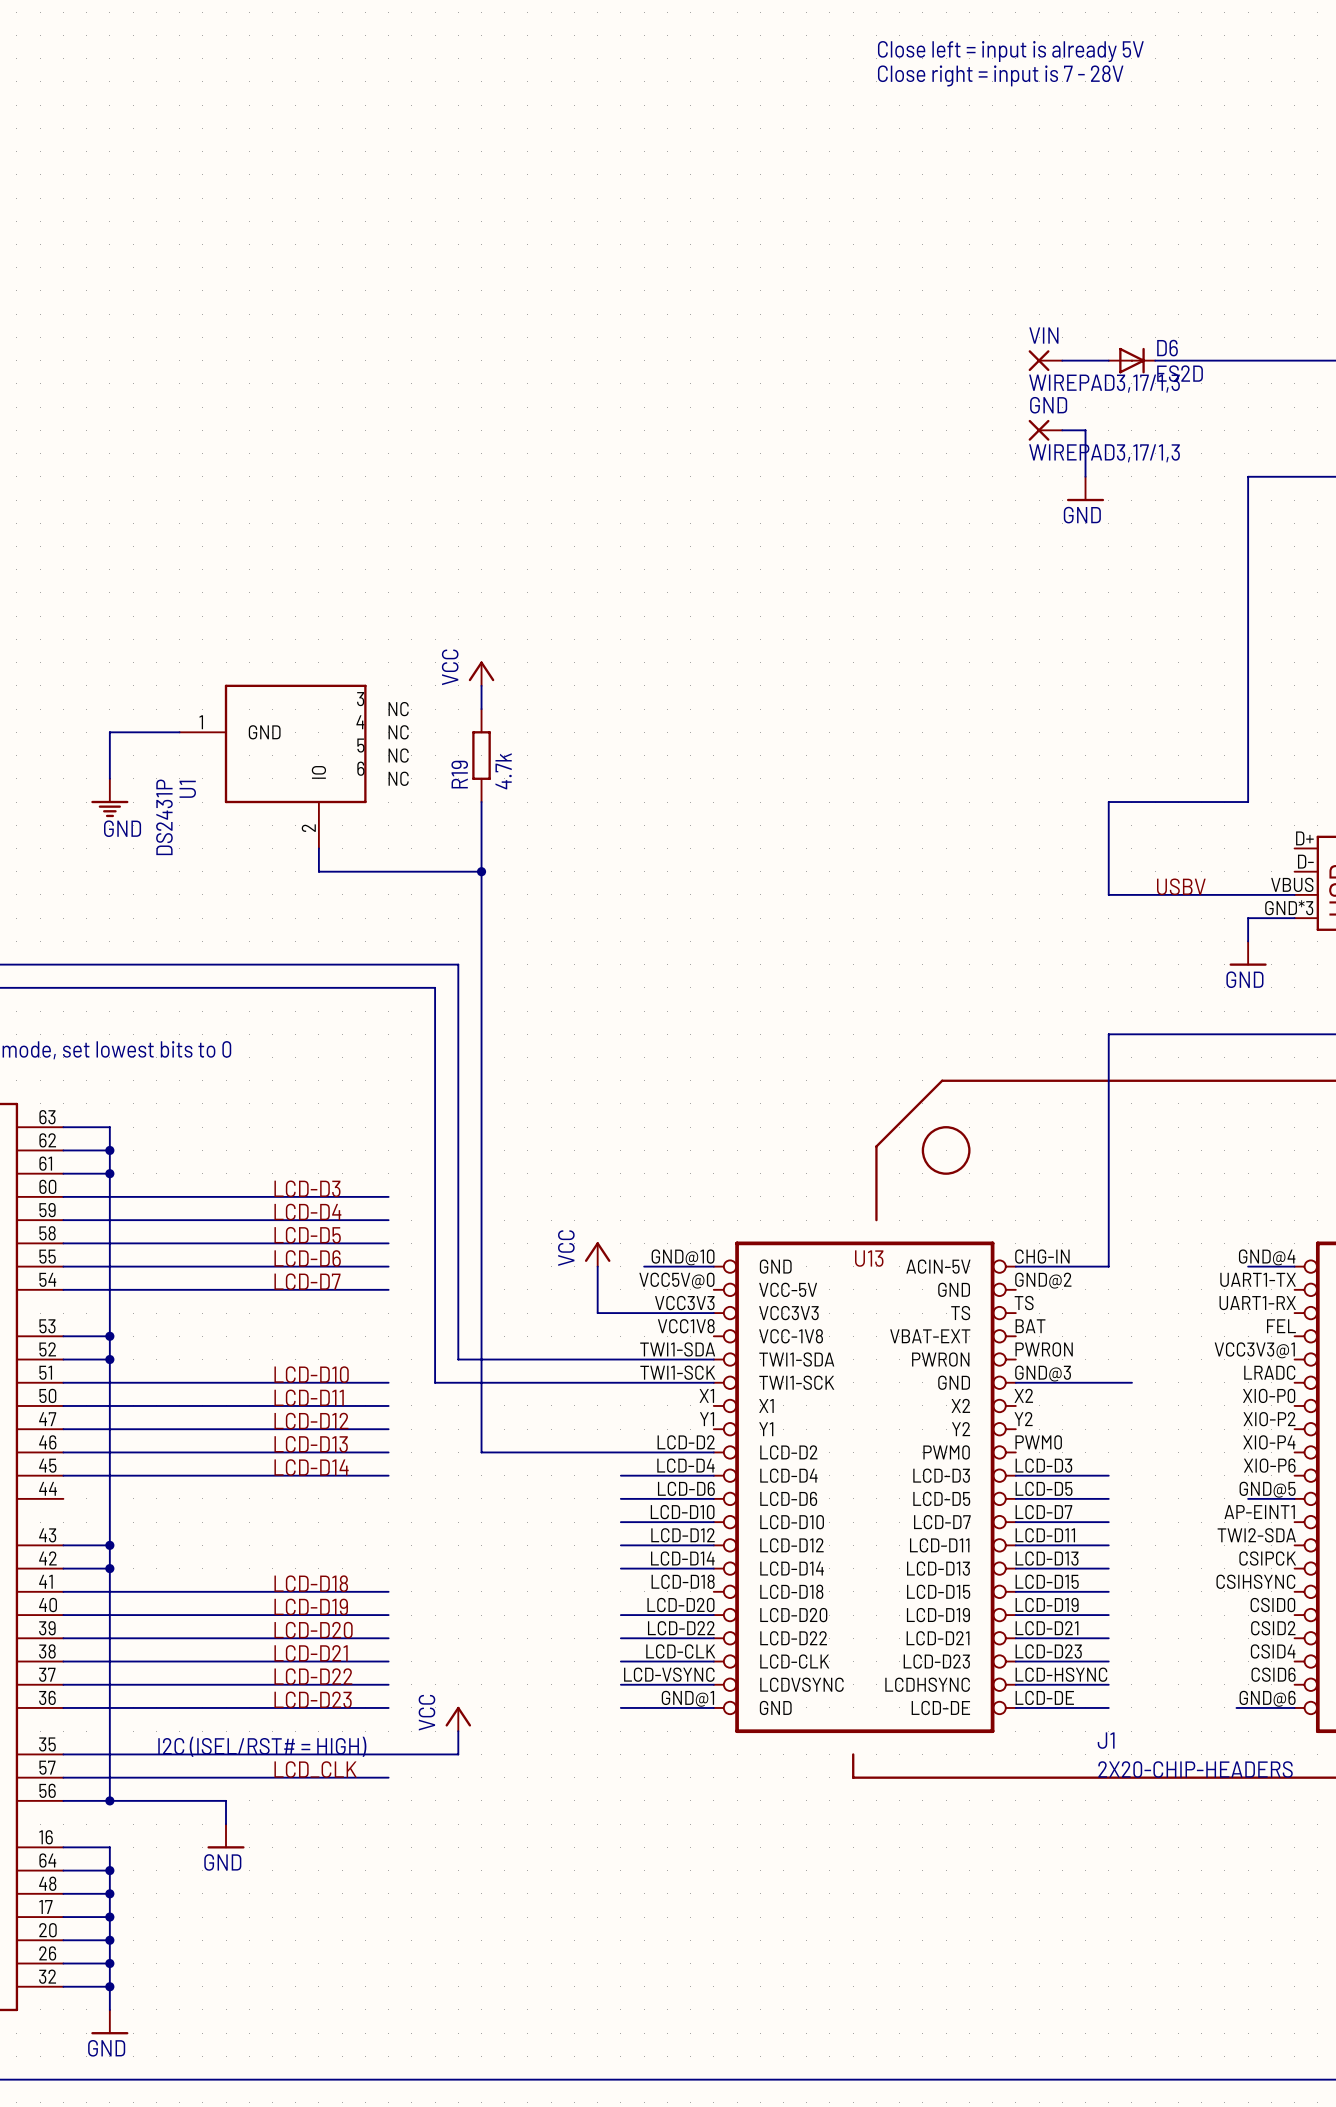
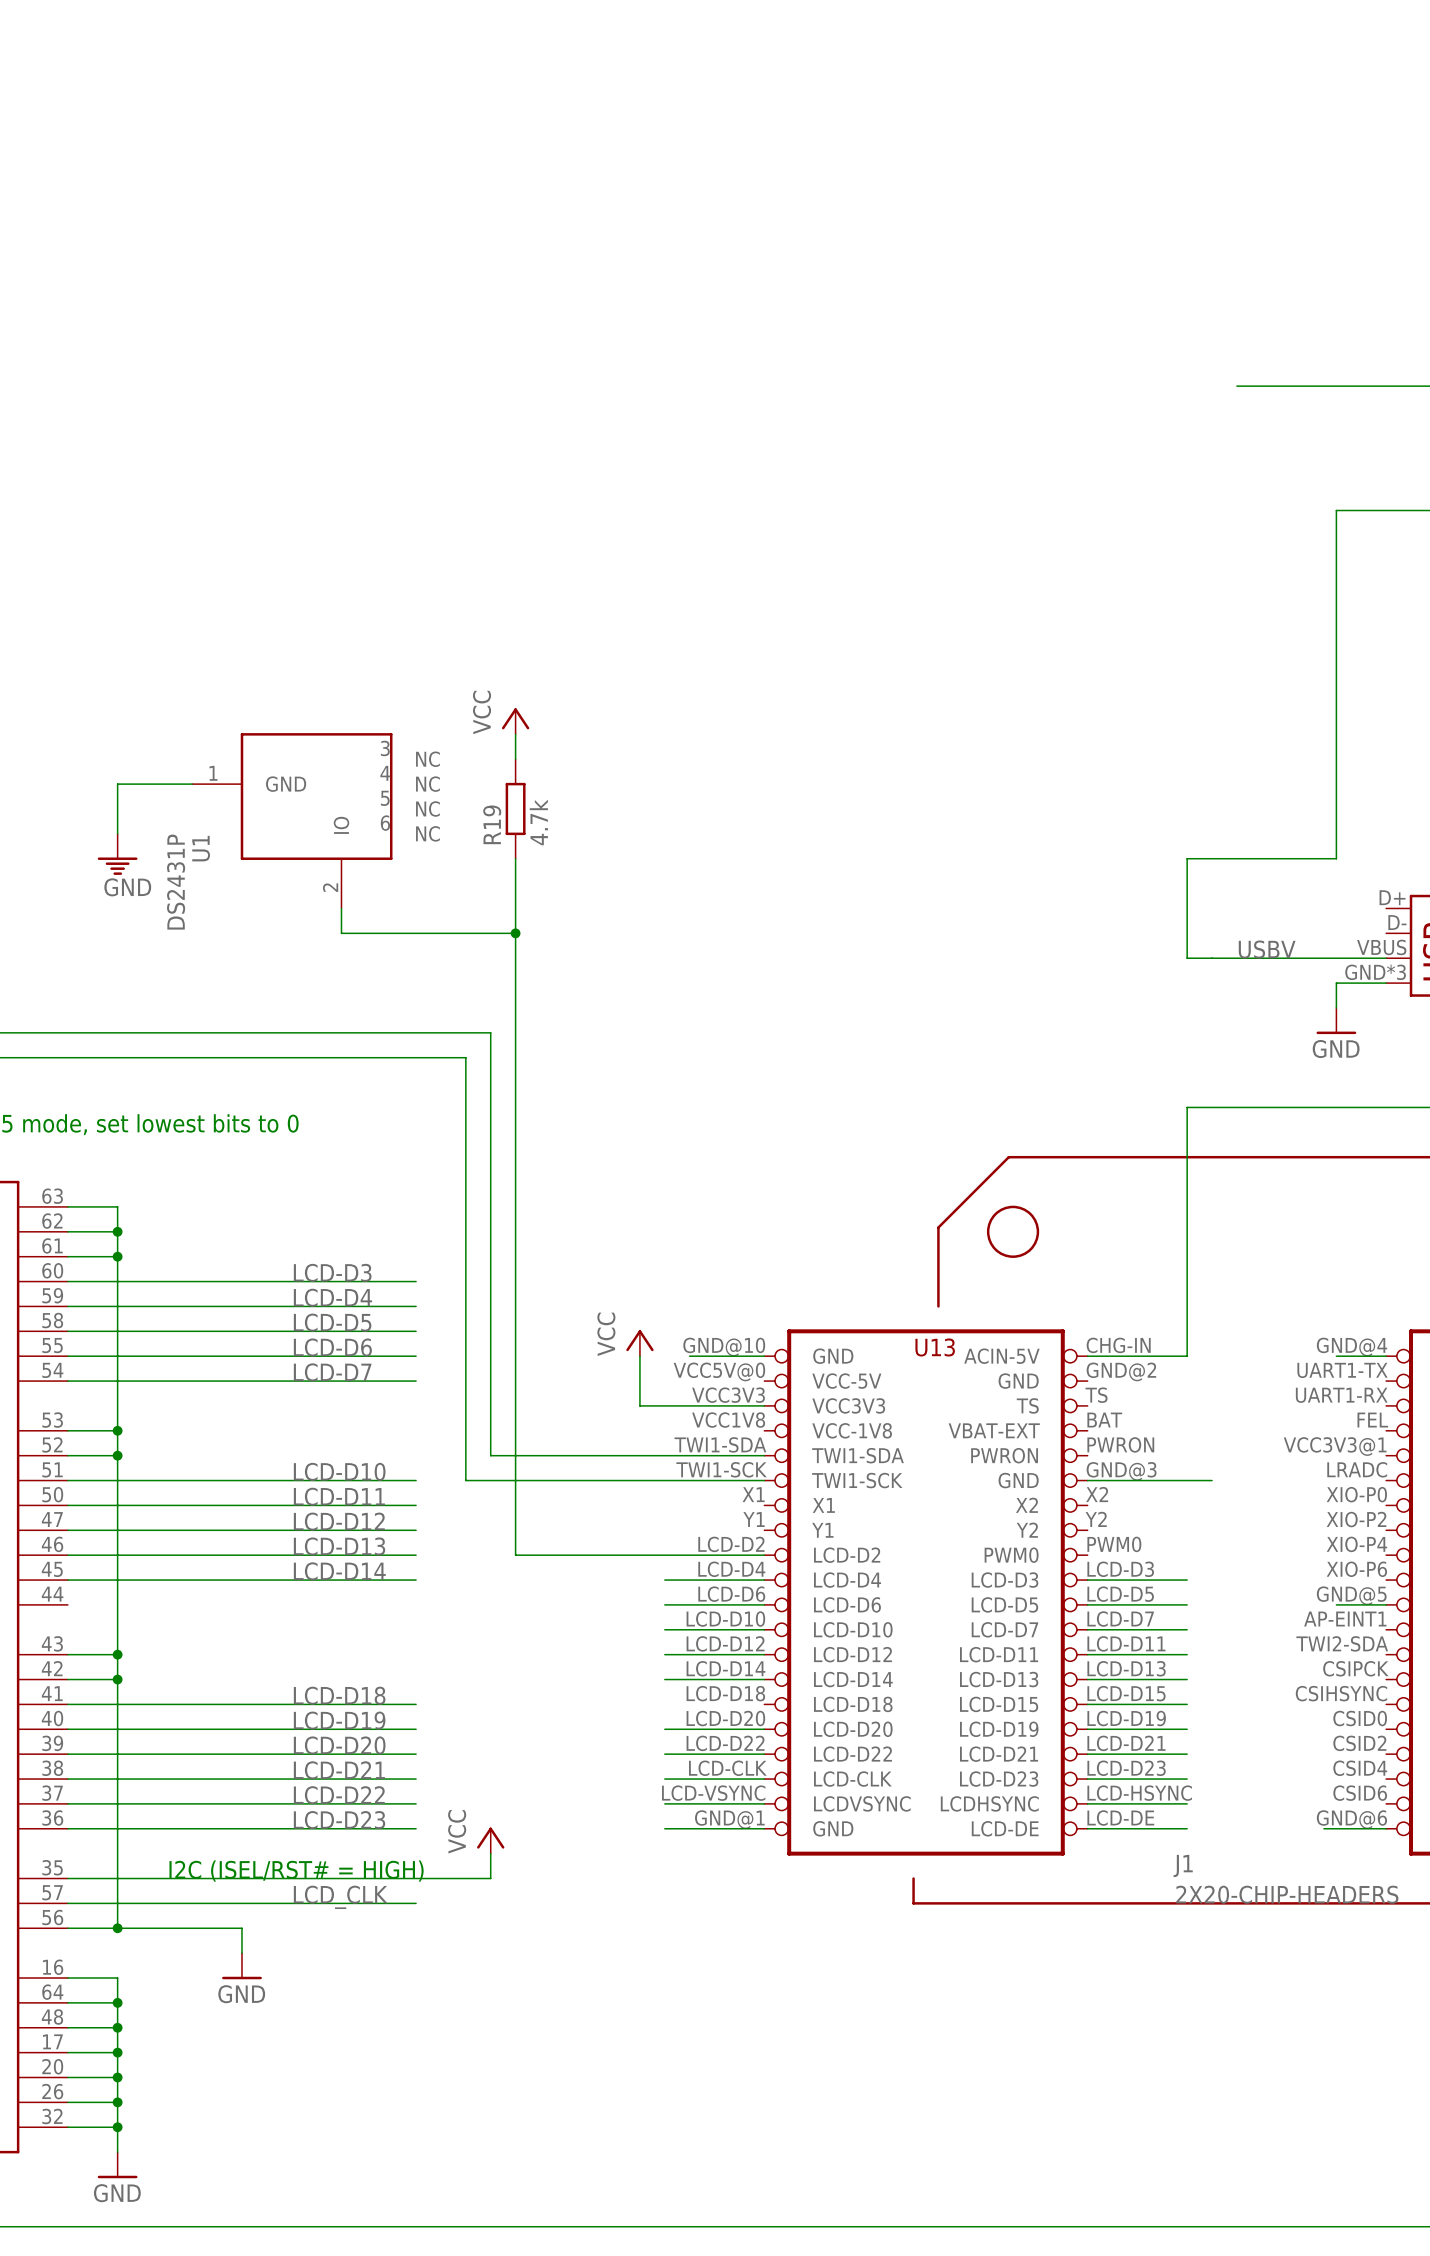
text: Close left = input is already 5V (1010, 51) -> none
text: Close right = input is 7 - 28V (1000, 75) -> none
VIN: WIREPAD3,17/1,3 (1045, 360) -> none
wire: (1062, 360) (1108, 360) -> none
D6: ES2D (1131, 360) -> none
GND: WIREPAD3,17/1,3 (1045, 430) -> none
wire: (1062, 430) (1085, 430) (1085, 476) -> none
power symbol: GND (1085, 488) -> none

